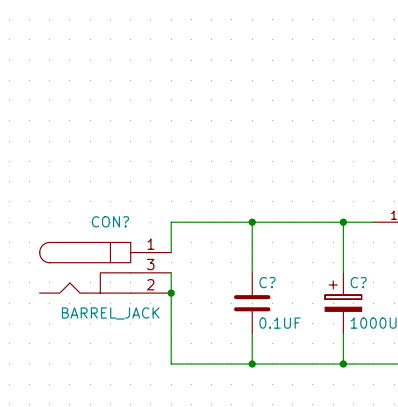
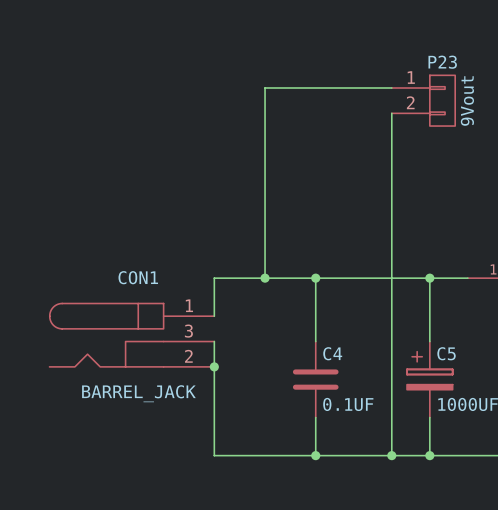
wire: none -> (391, 88) (265, 88) (265, 278)
P23: none -> 9Vout (423, 100)
wire: none -> (391, 113) (391, 455)
CON? name: CON? (110, 221) -> CON1 (138, 277)
junction: none -> (265, 278)
C? name: C? (267, 282) -> C4 (332, 353)
C? name: C? (358, 282) -> C5 (446, 353)
junction: none -> (391, 455)

